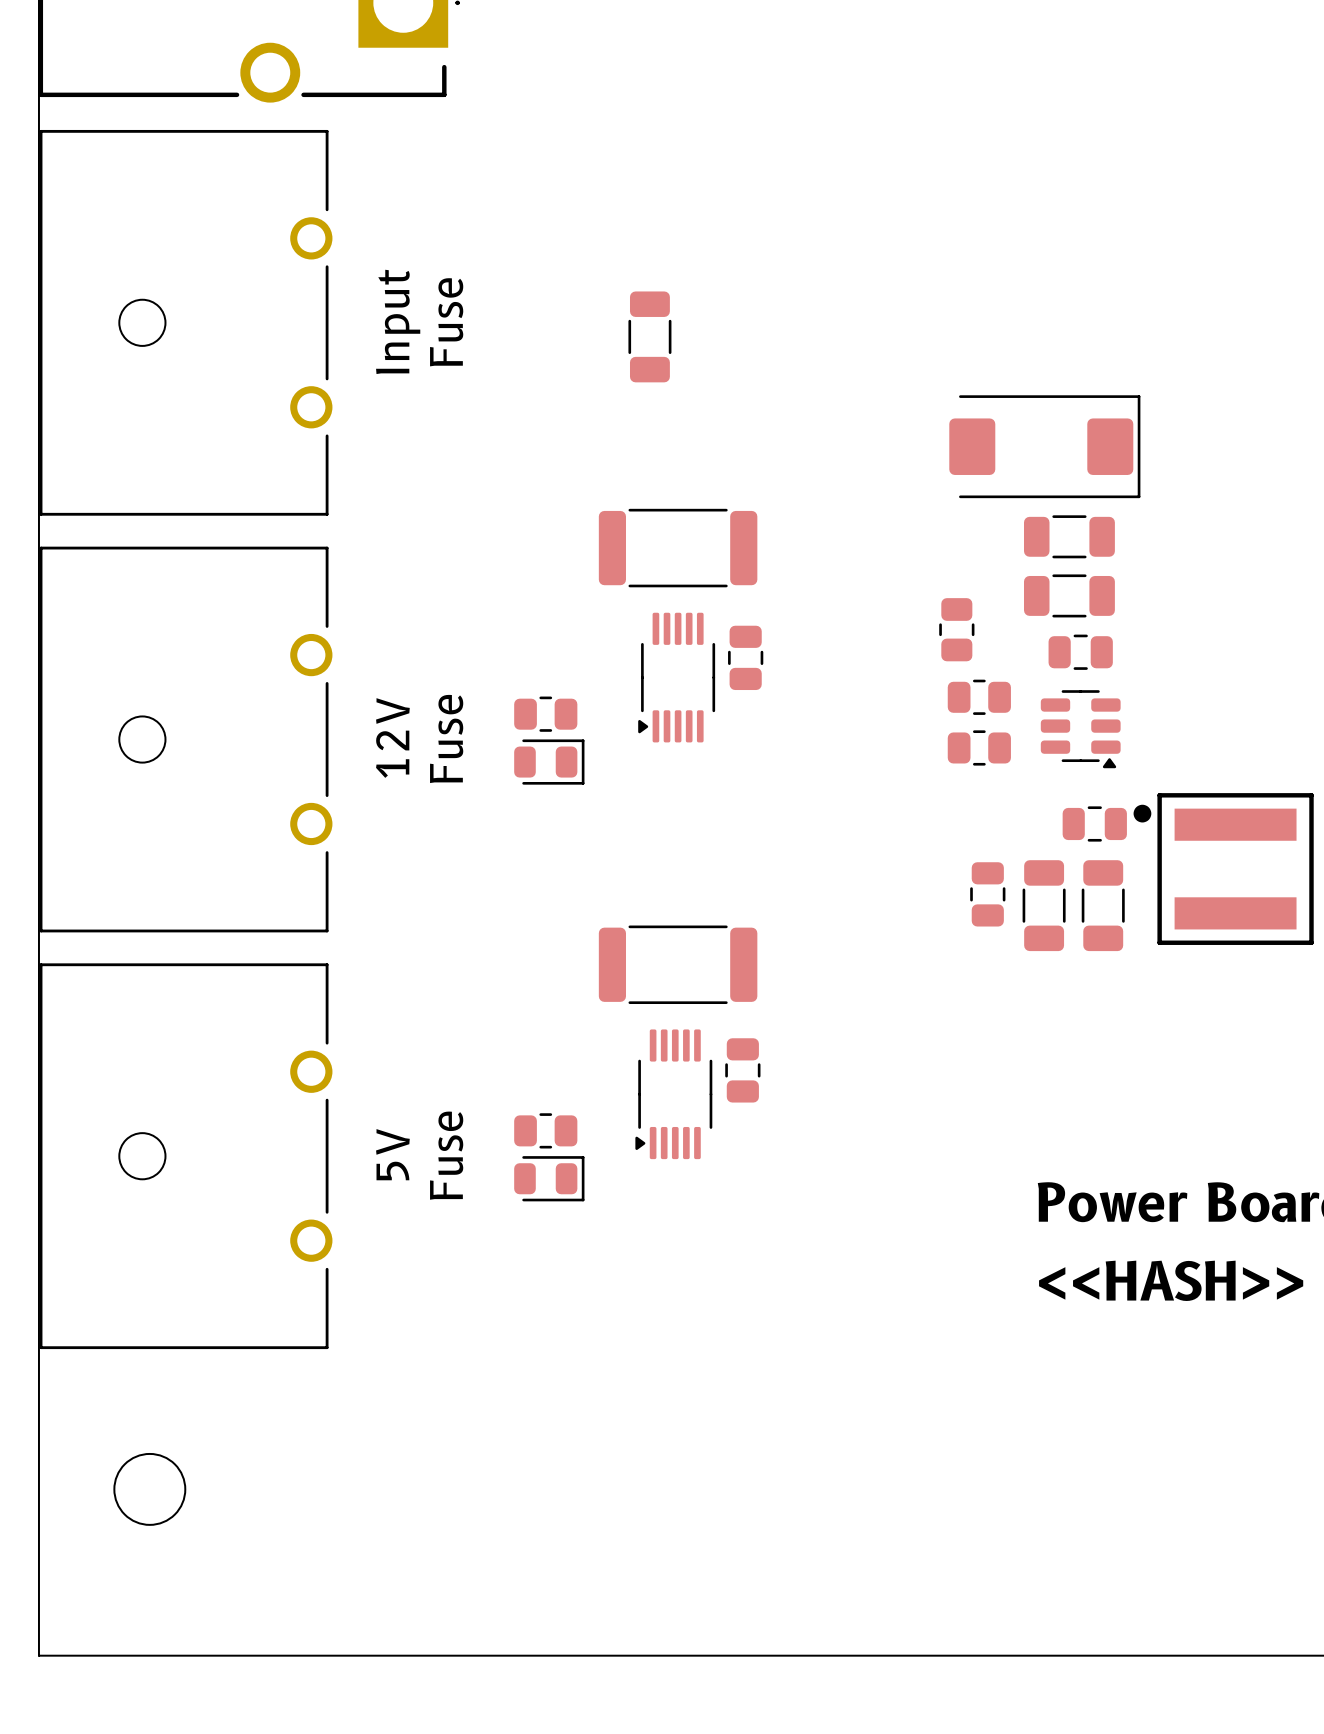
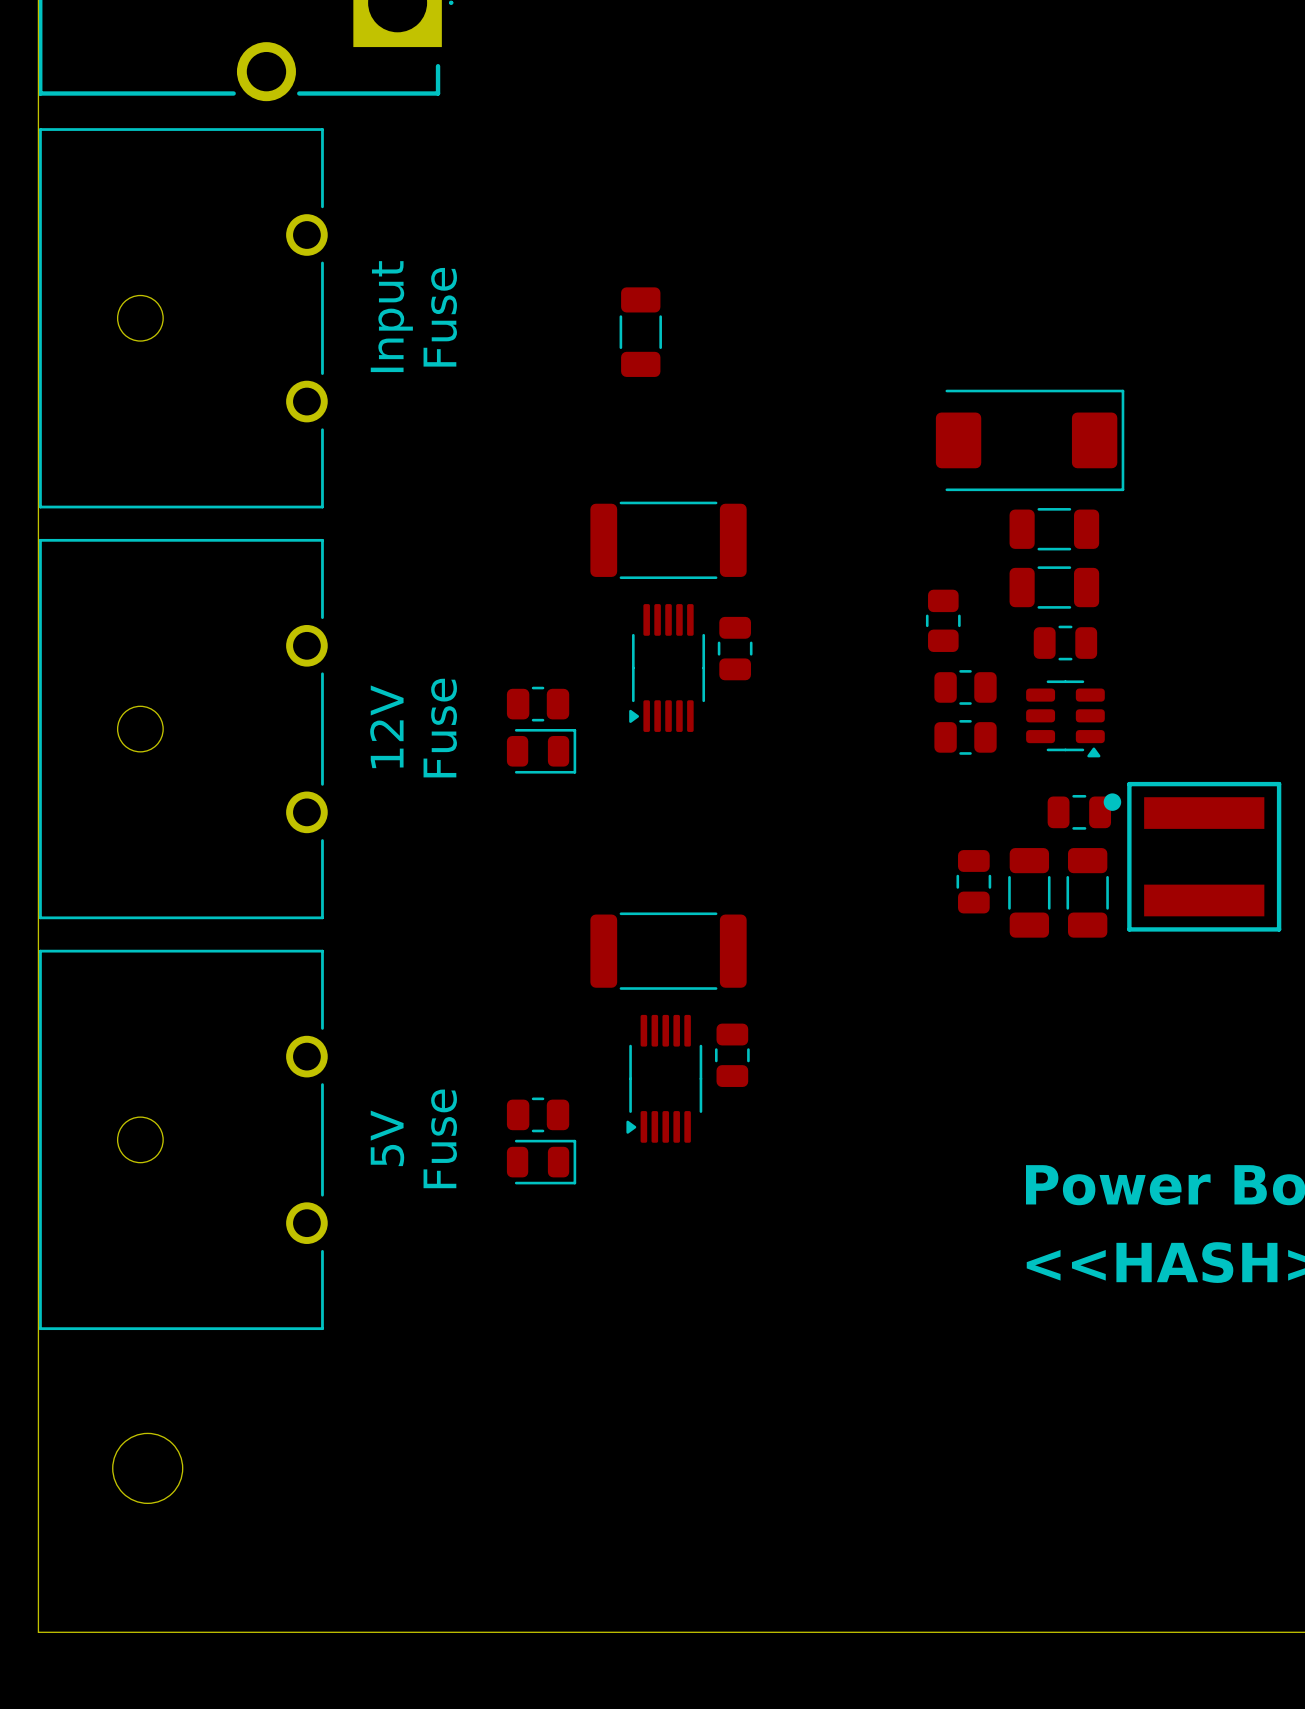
part position: (1223, 869) -> (1192, 856)

